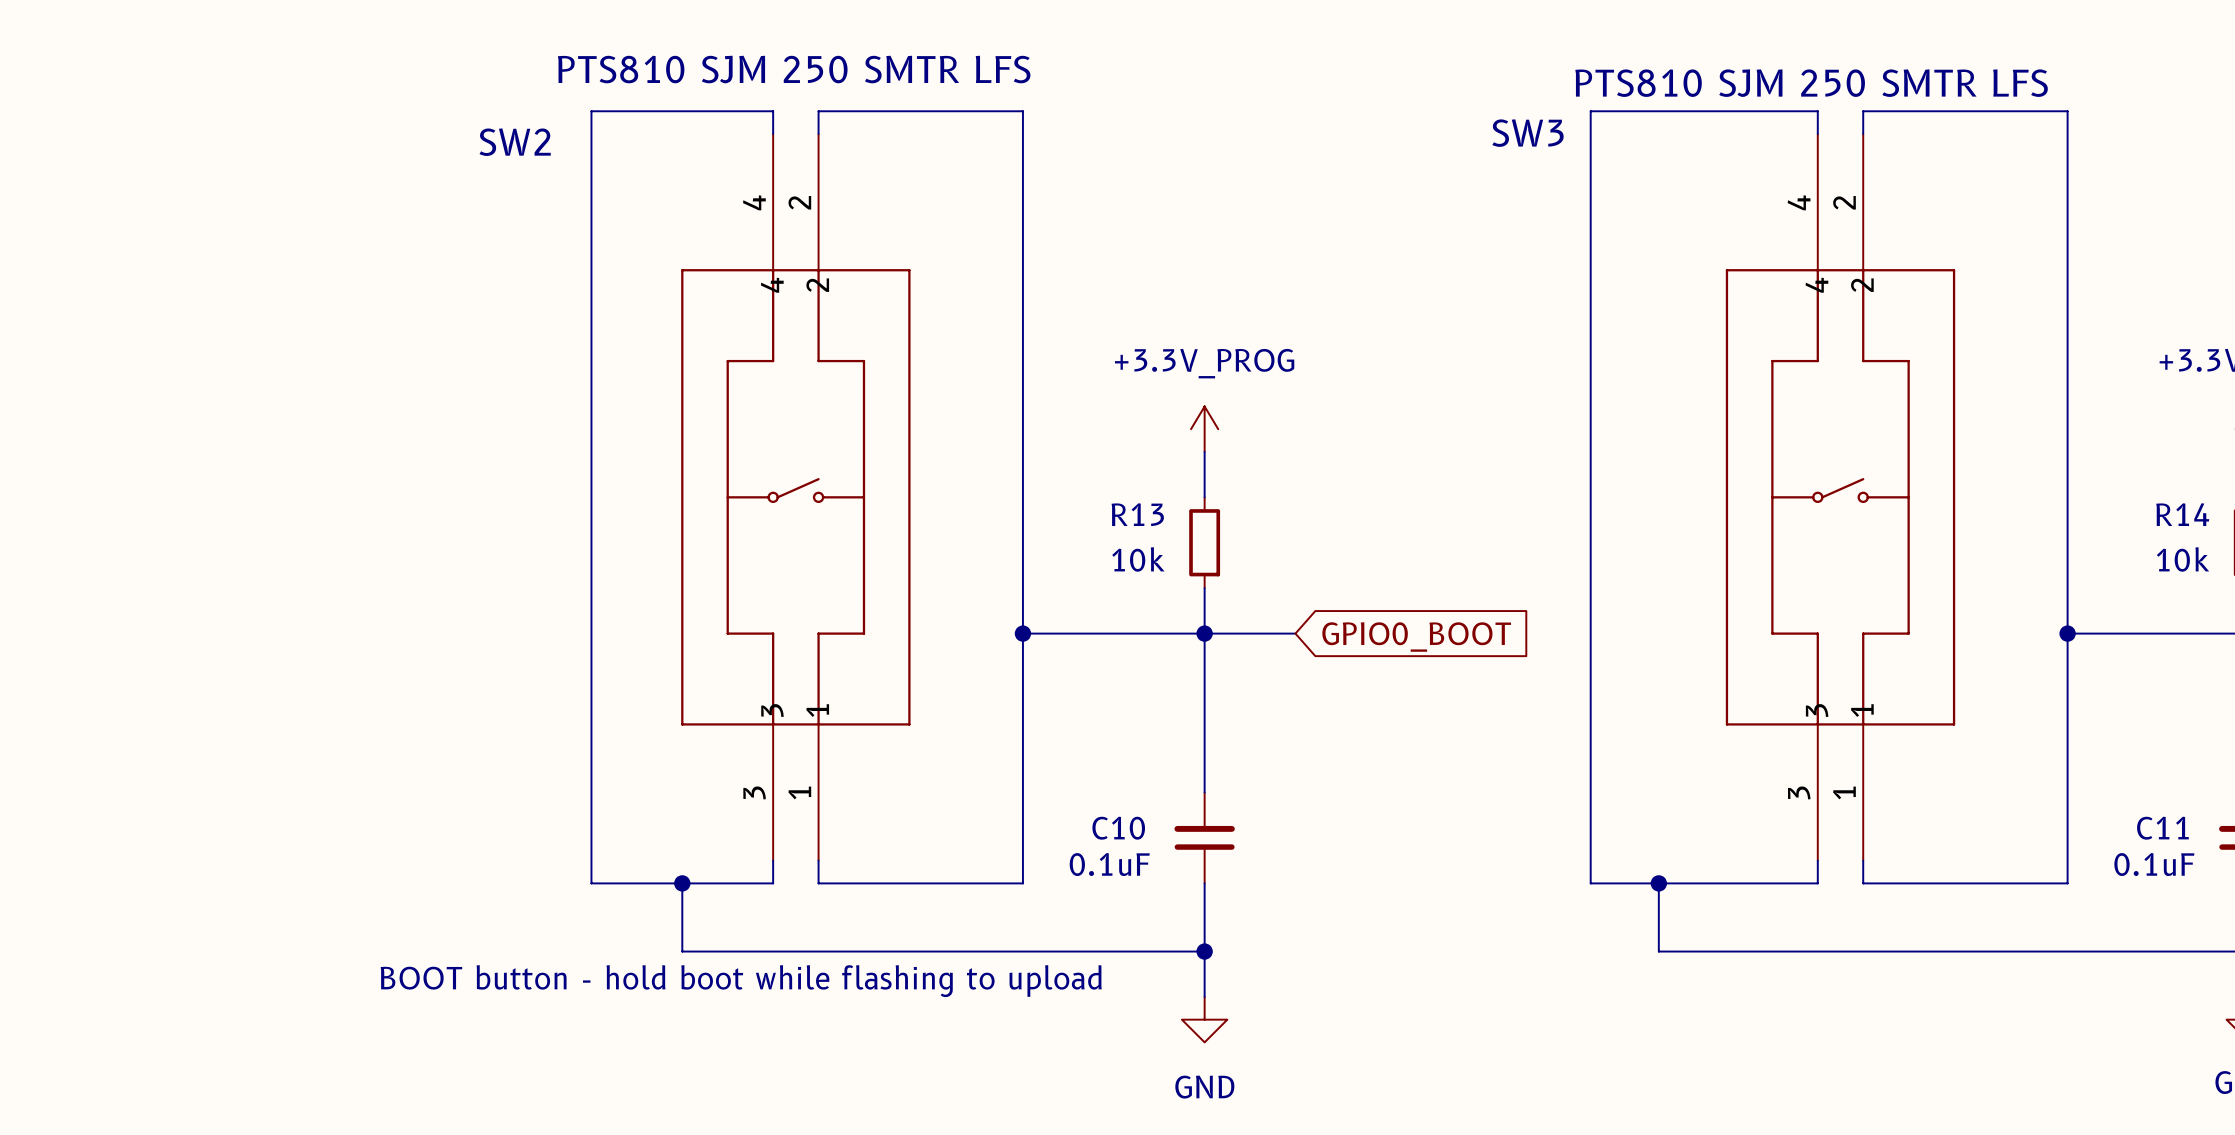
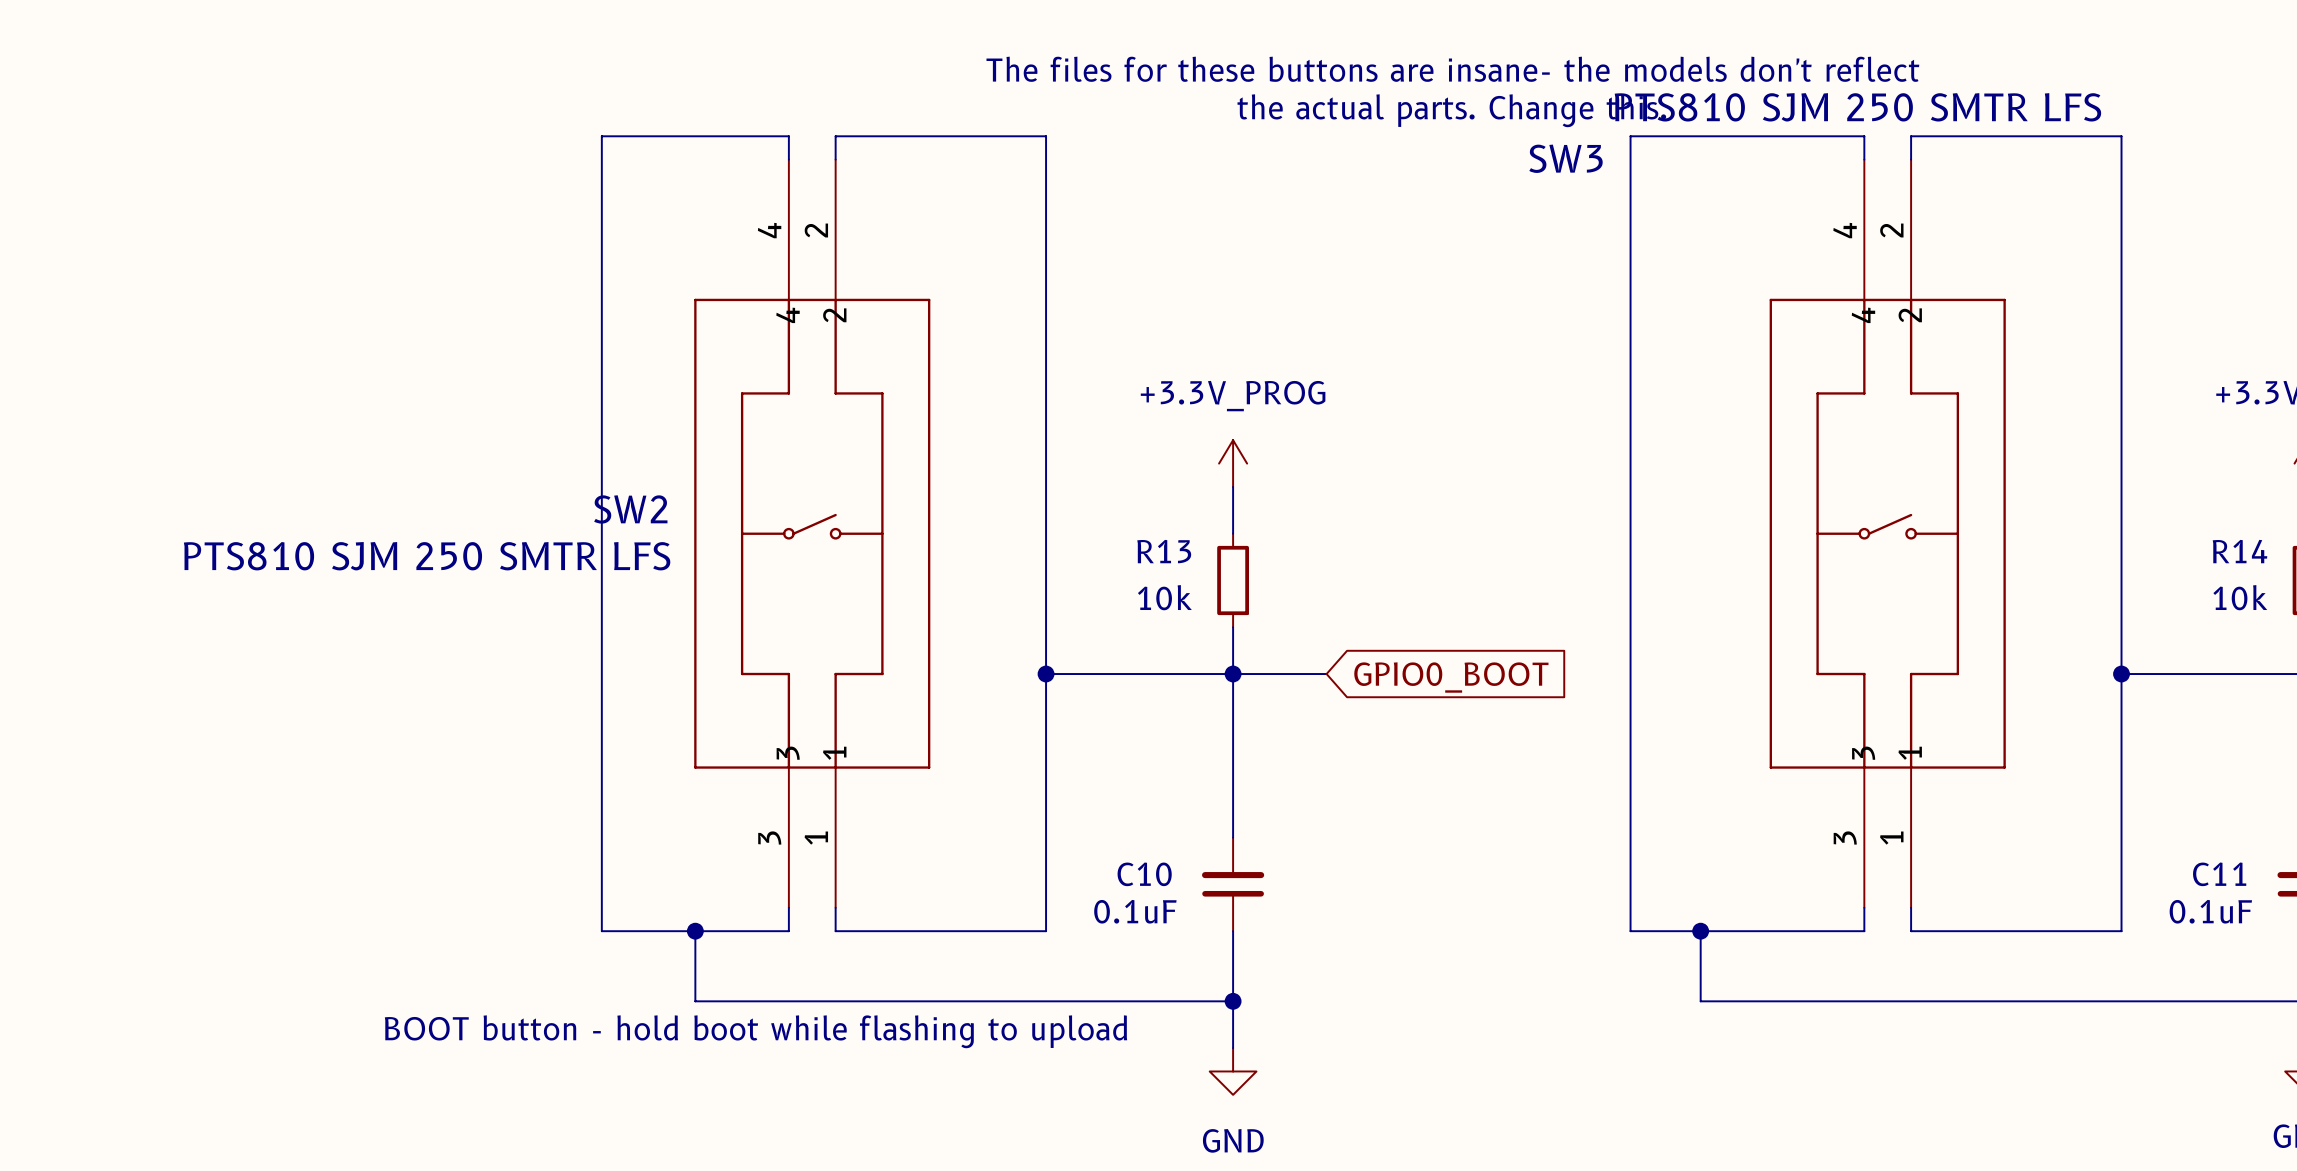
text: none -> The files for these buttons are insane- the models don't reflect (1452, 69)
SW2 value position: PTS810 SJM 250 SMTR LFS (794, 69) -> PTS810 SJM 250 SMTR LFS (427, 556)
text: none -> the actual parts. Change this. (1451, 110)
SW2 name position: SW2 (515, 142) -> SW2 (630, 509)

